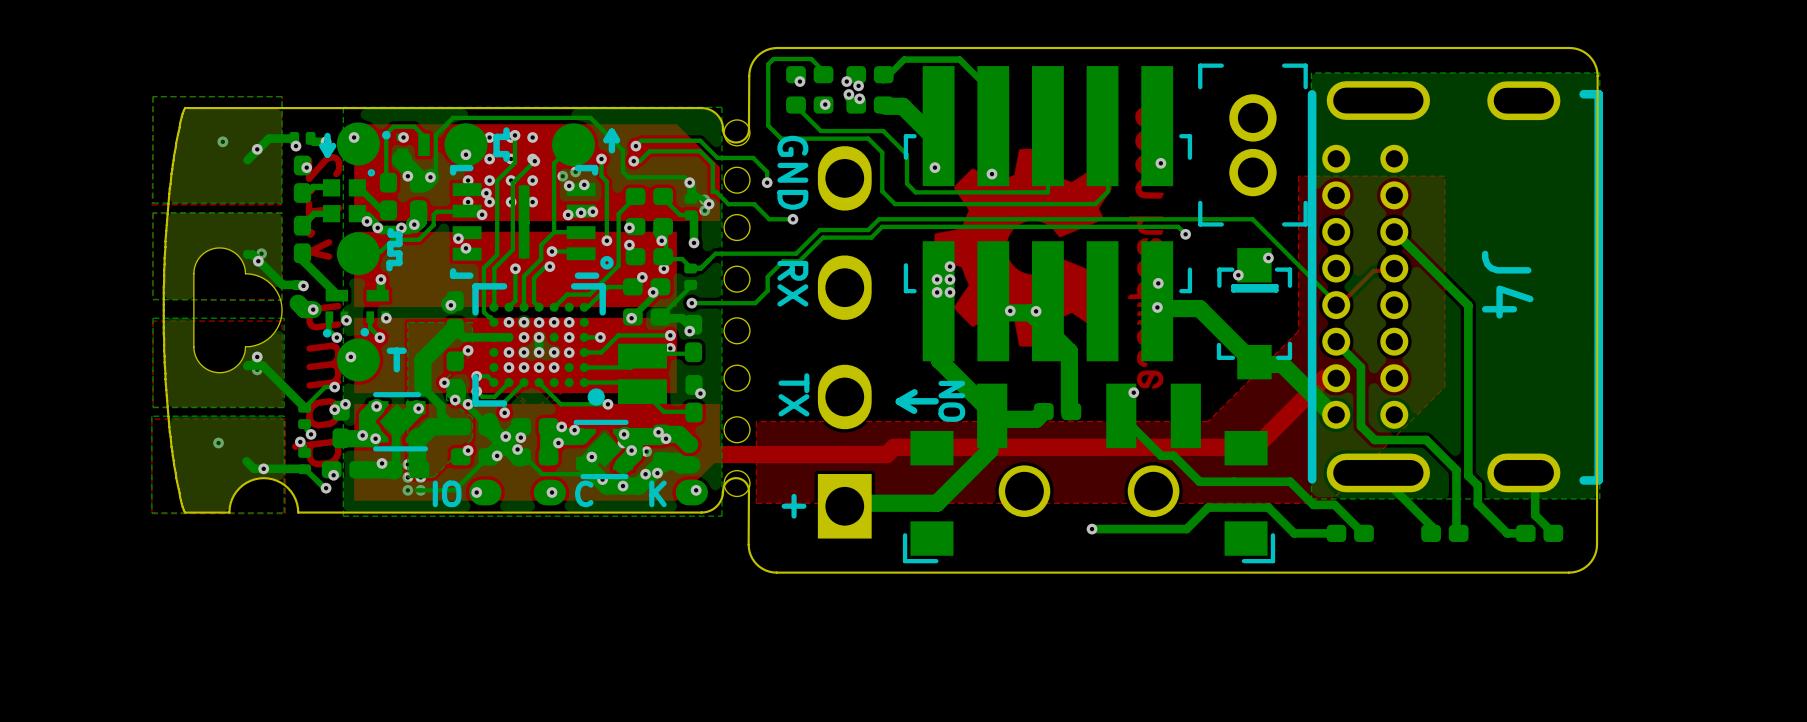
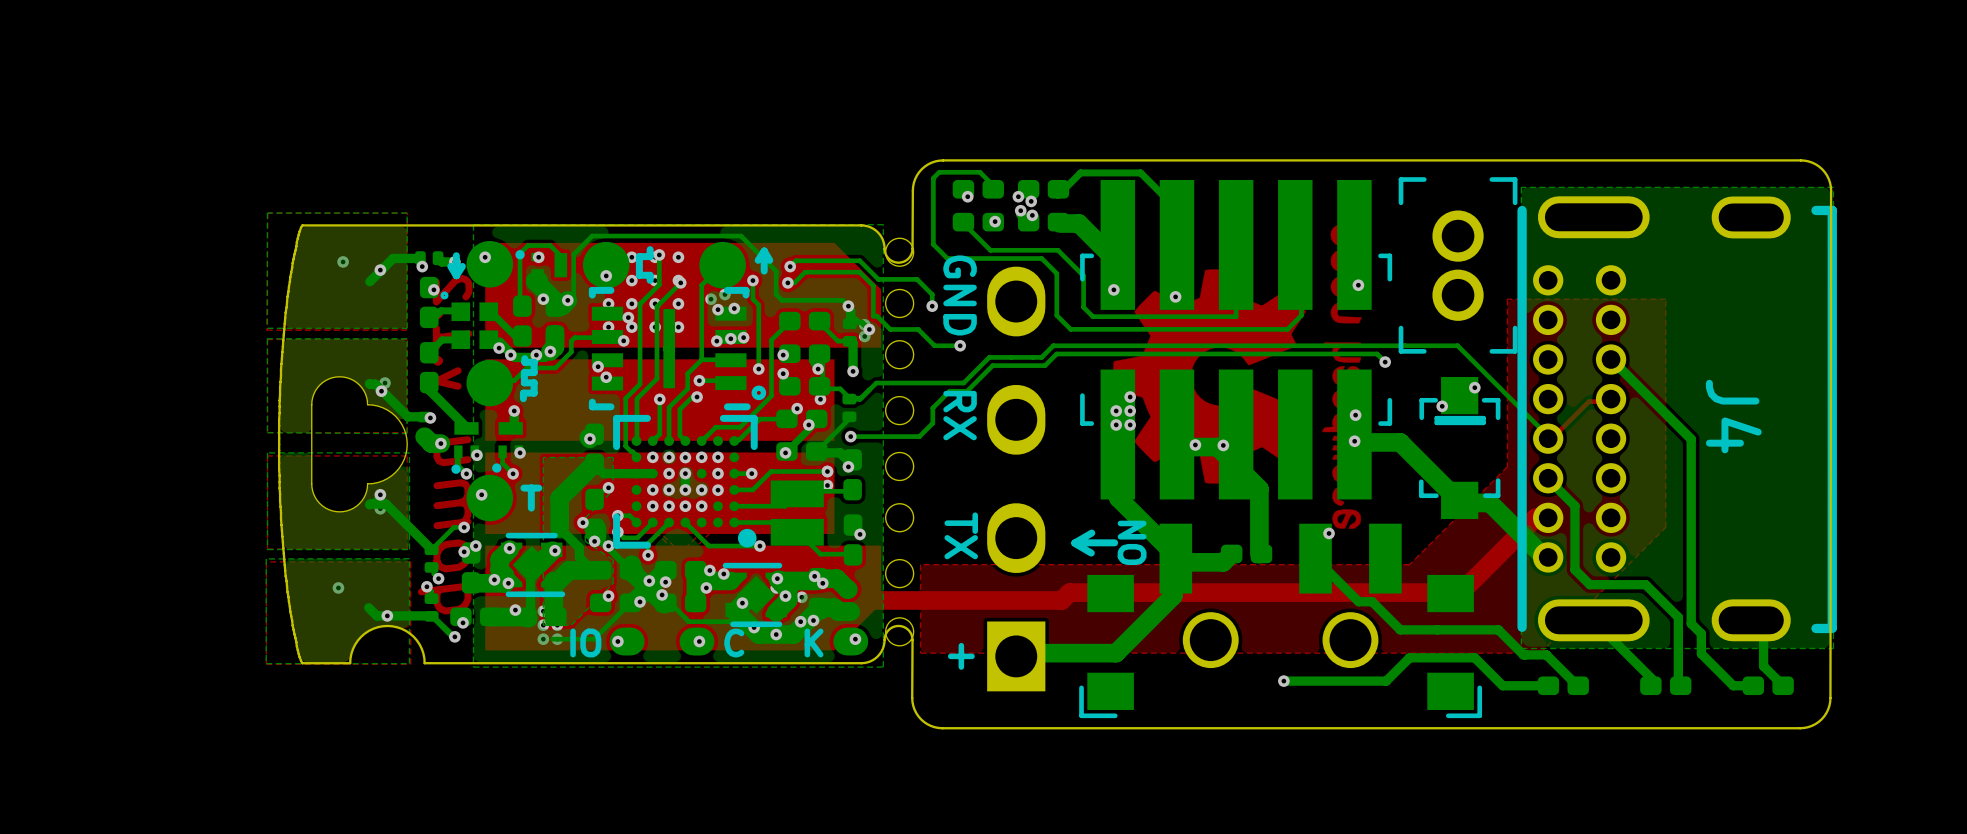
part footprint: [322, 169, 376, 223] -> [440, 291, 499, 350]

